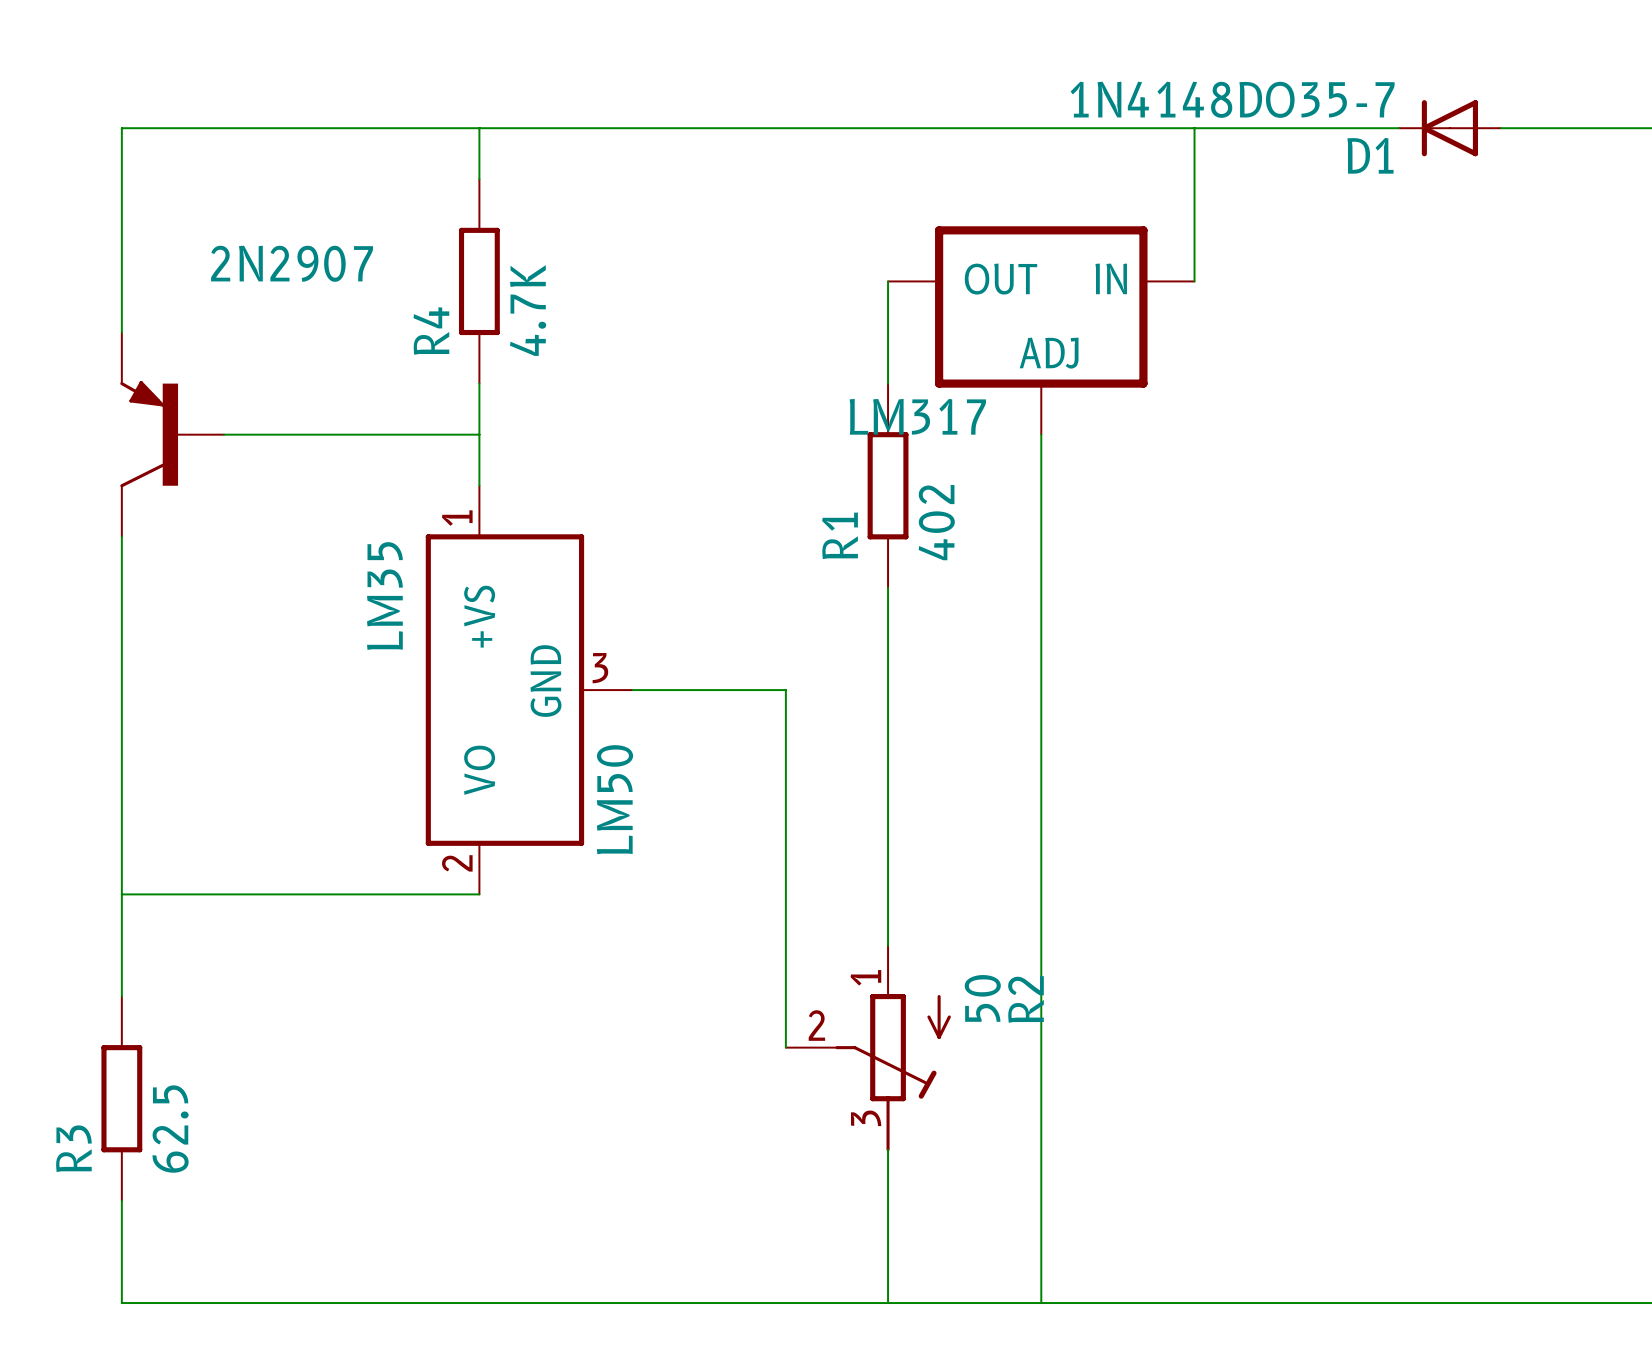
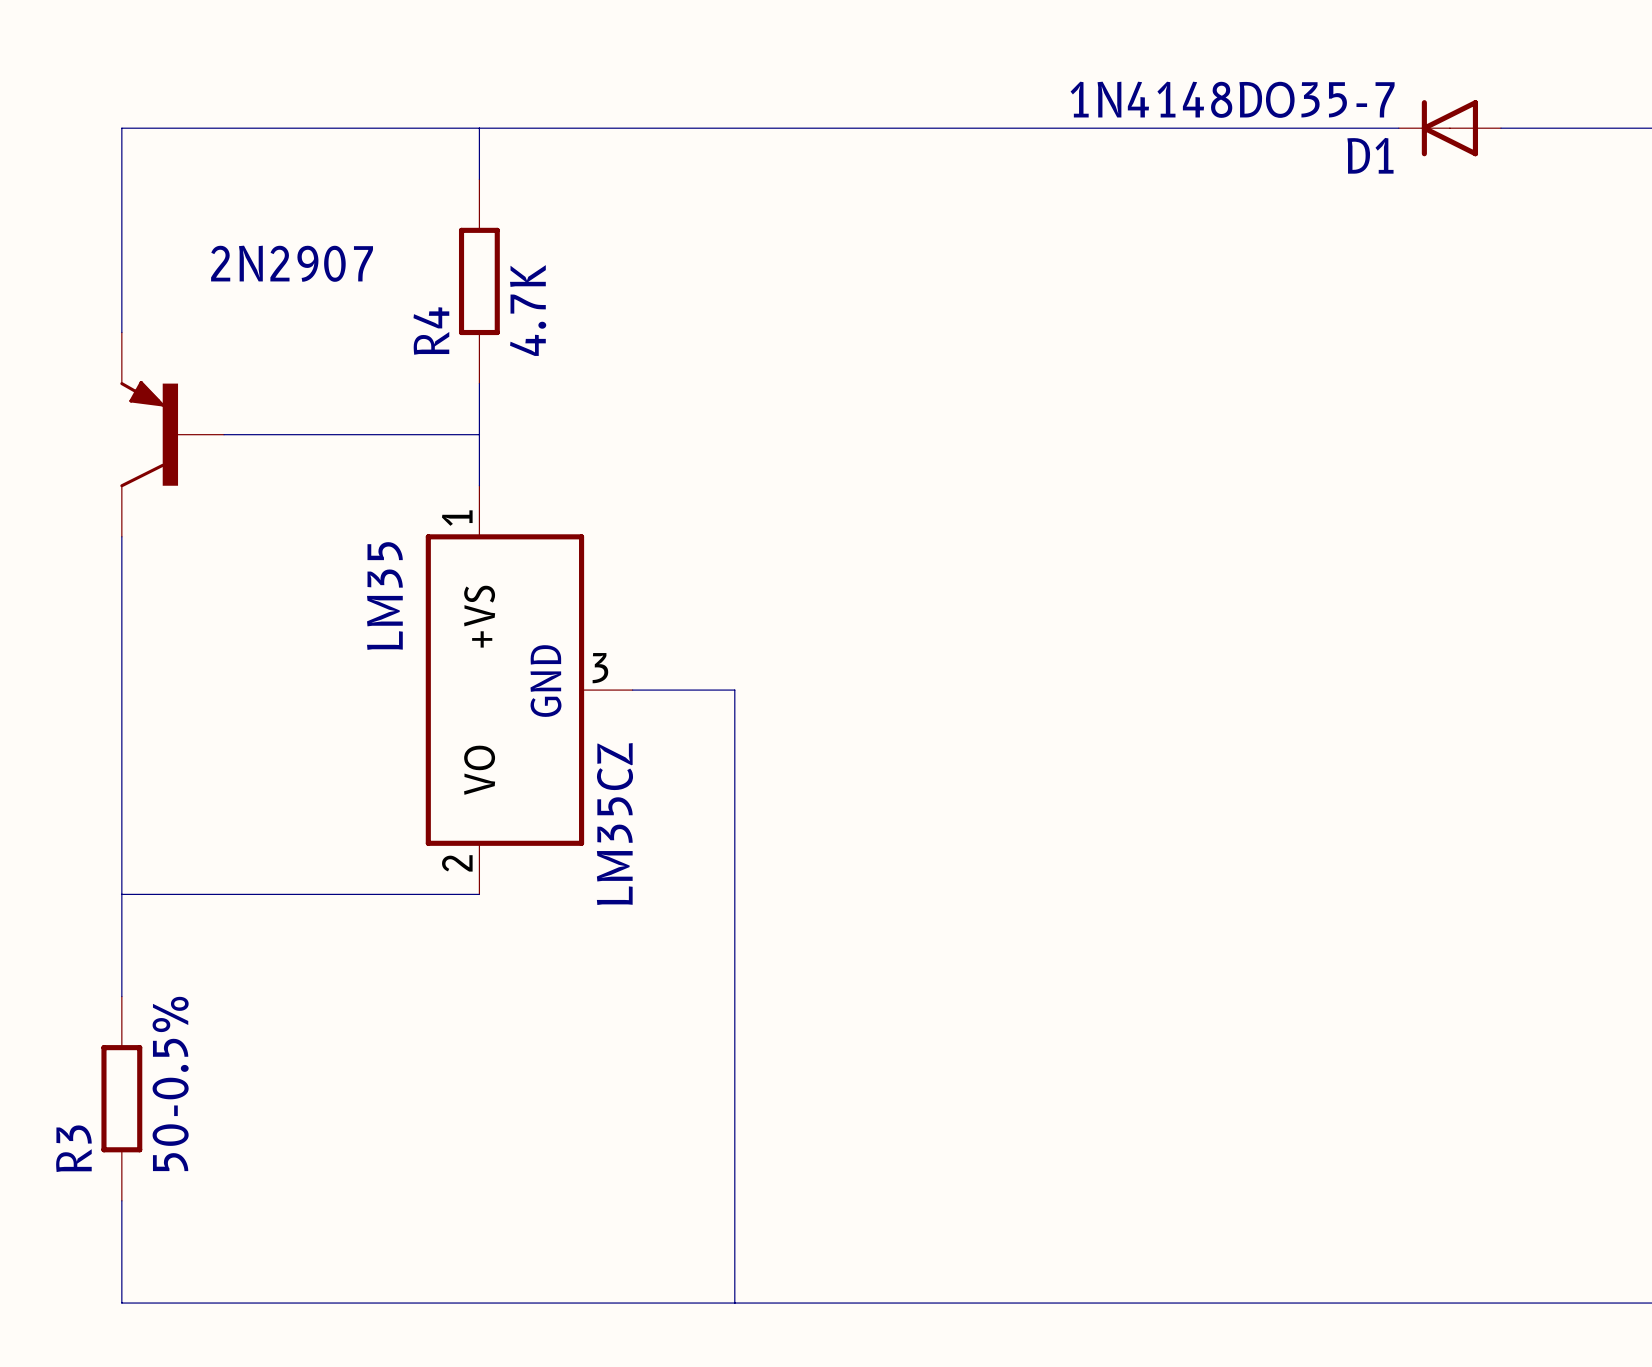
wire: (1194, 128) (1194, 281) -> none
wire: (888, 281) (888, 383) -> none
LM317: (1041, 330) -> none
wire: (1041, 434) (1041, 1303) -> none
R1: 402 (888, 485) -> none
wire: (888, 587) (888, 945) -> none
wire: (734, 690) (785, 690) (785, 1047) -> (734, 690) (734, 1303)
LM35 value: LM50 (614, 799) -> LM35CZ (614, 824)
R2: 50 (868, 1048) -> none
R3 value: 62.5 (170, 1129) -> 50-0.5% (170, 1083)
wire: (888, 1149) (888, 1303) -> none

